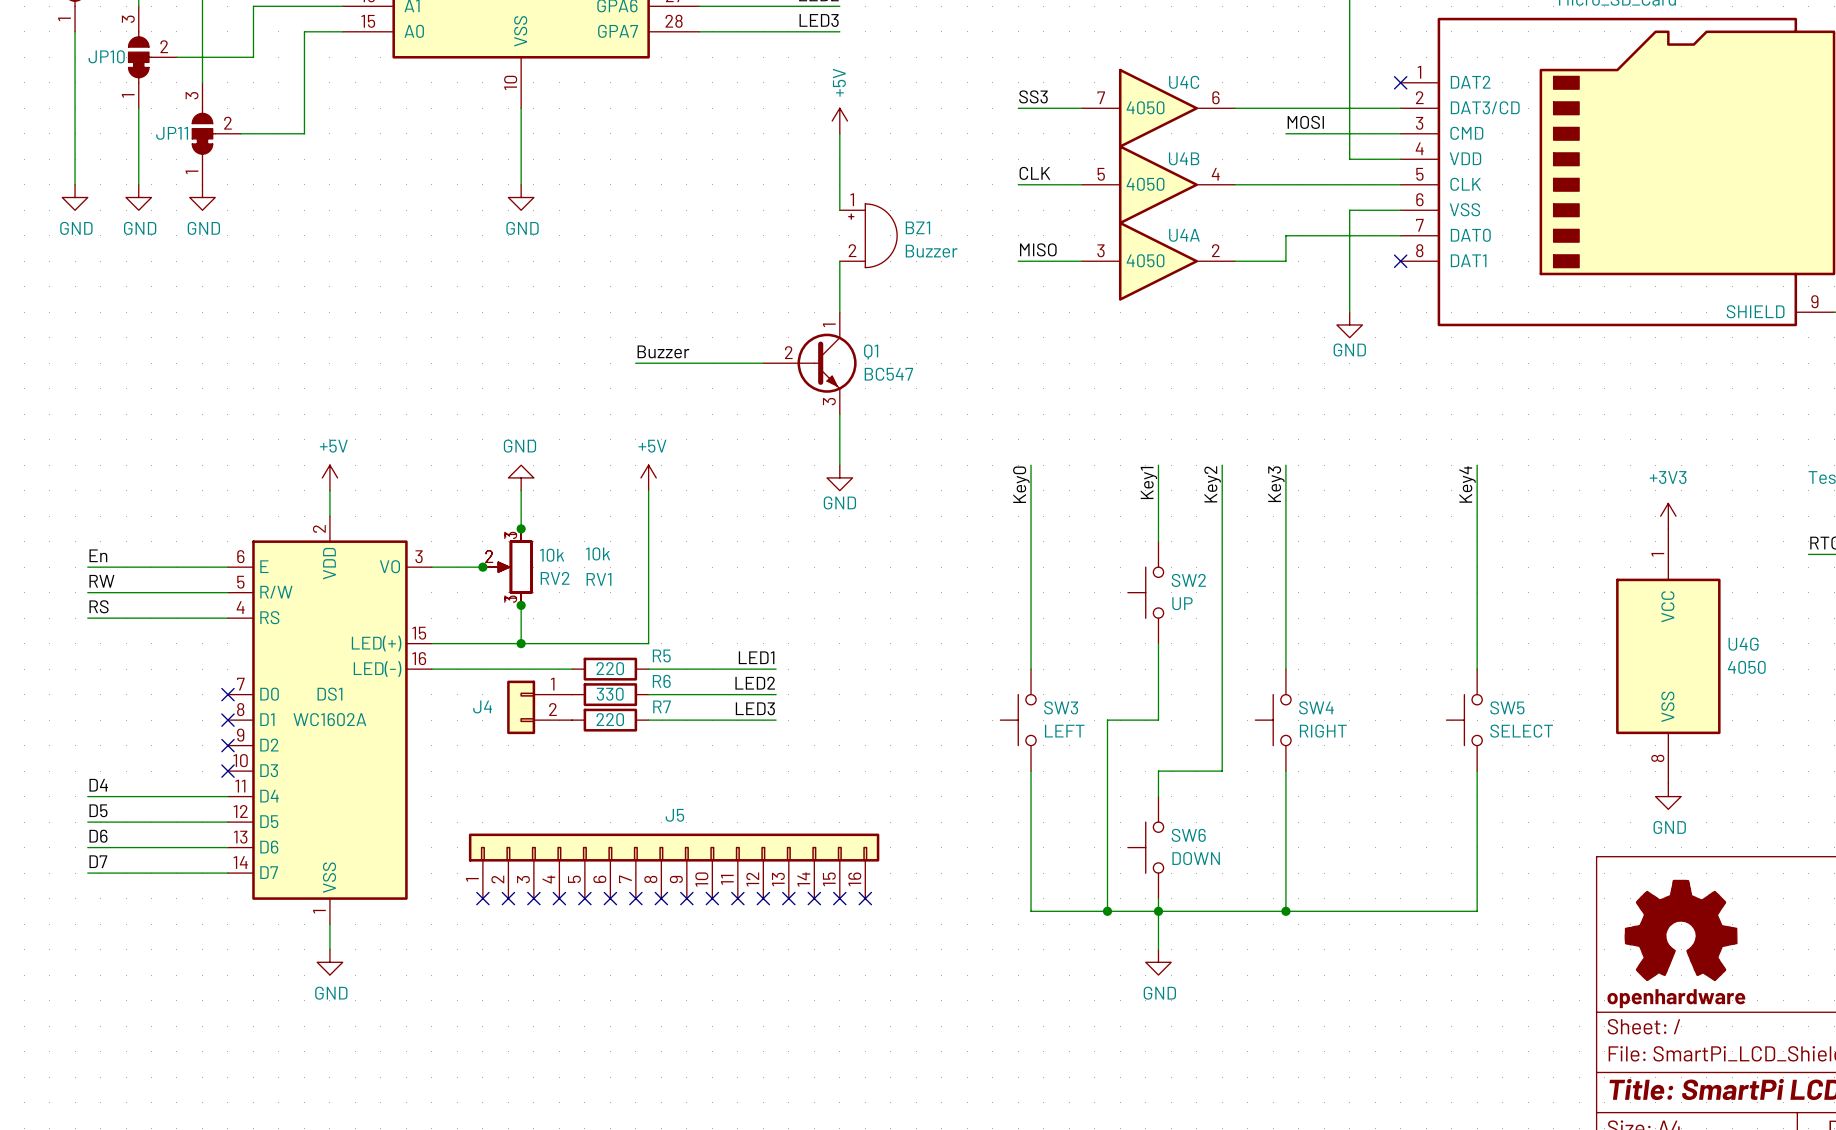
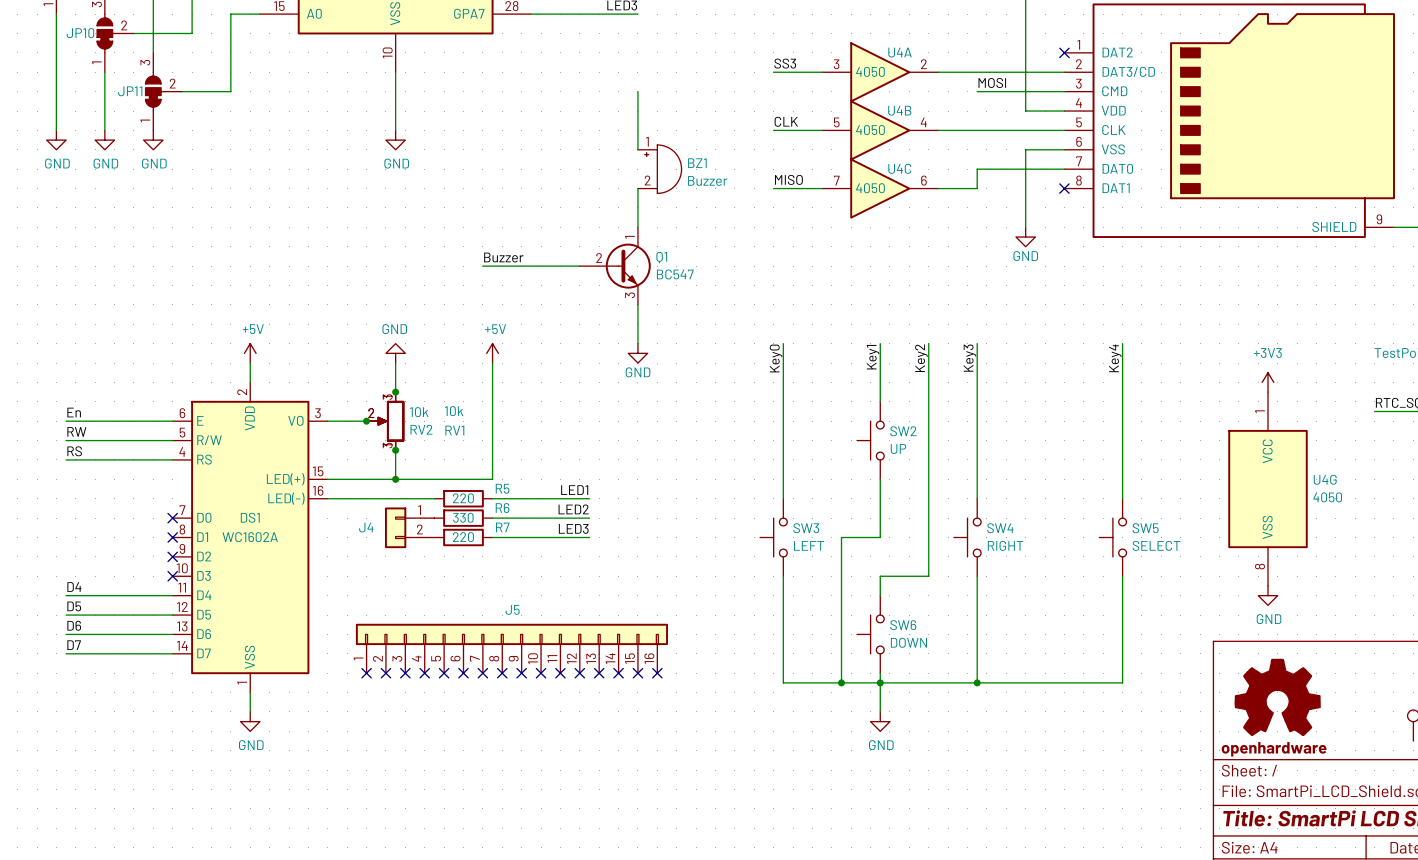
U4C position: (1158, 108) -> (880, 188)
power symbol: +5V (839, 121) -> none
U4A position: (1158, 261) -> (880, 72)

